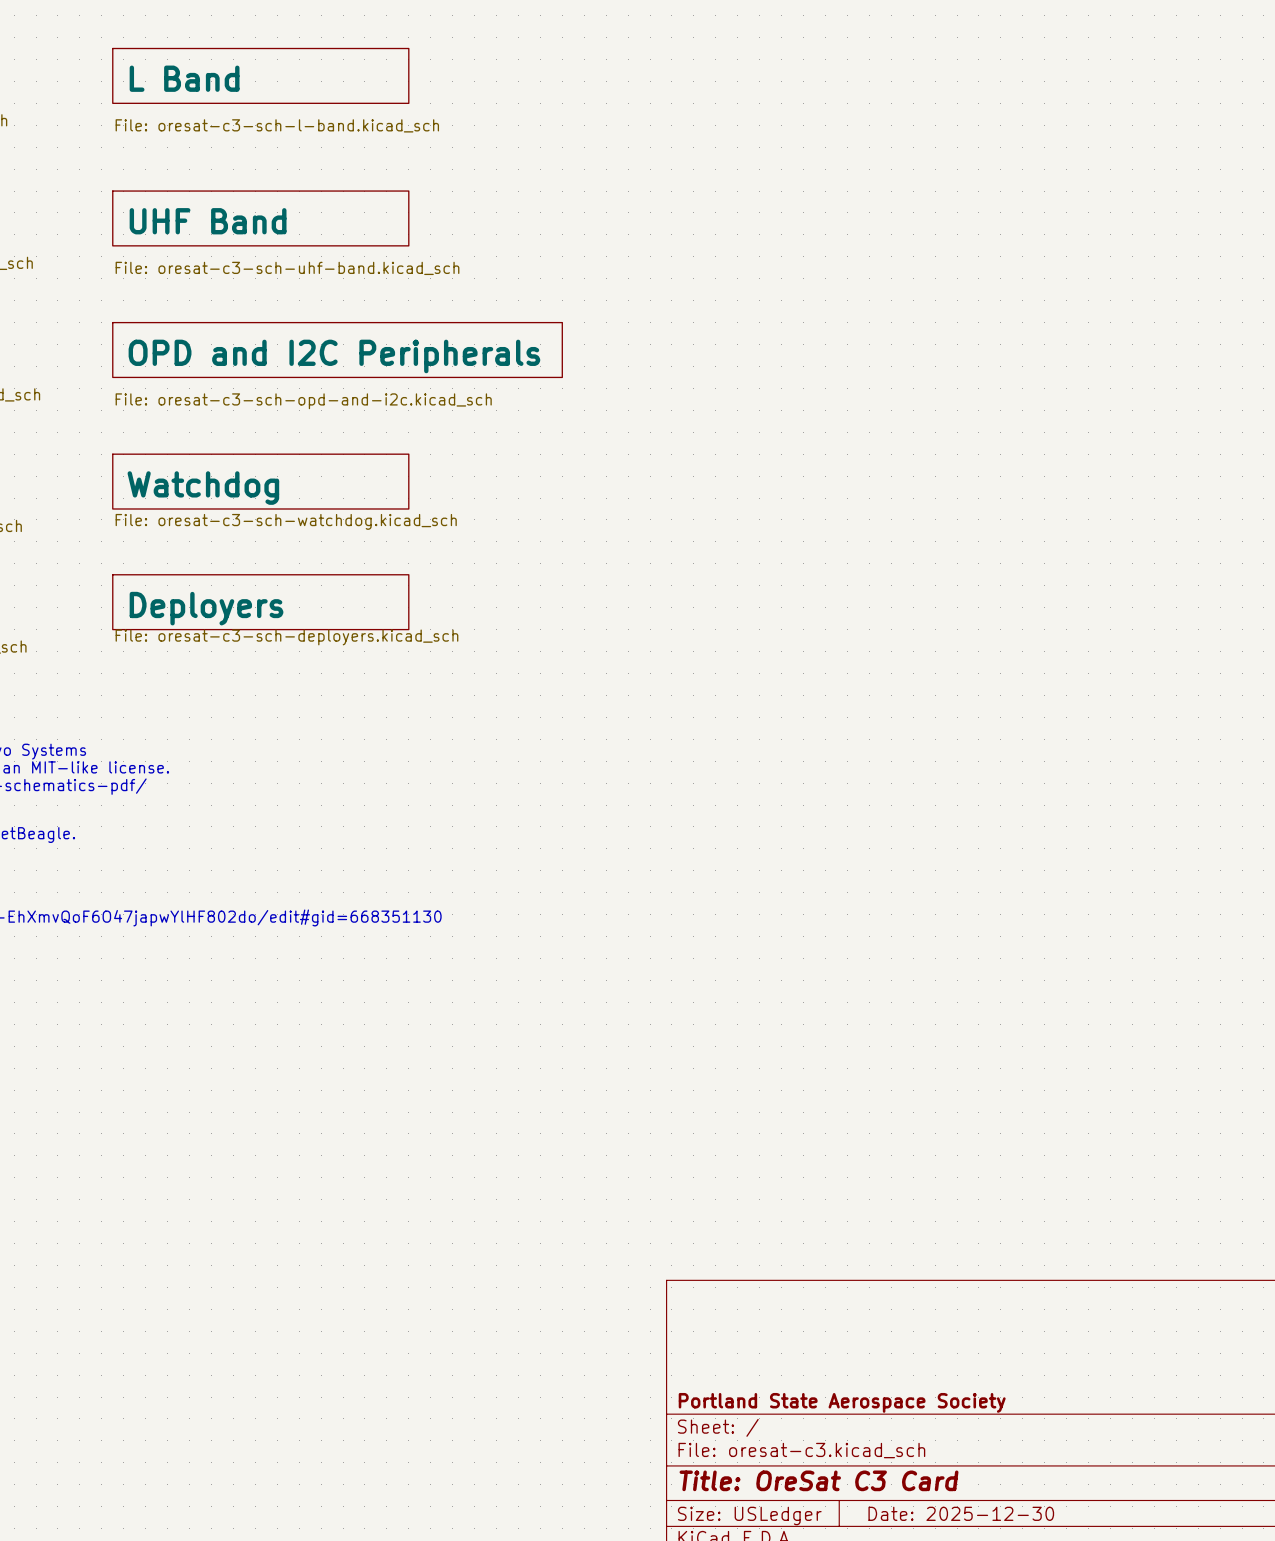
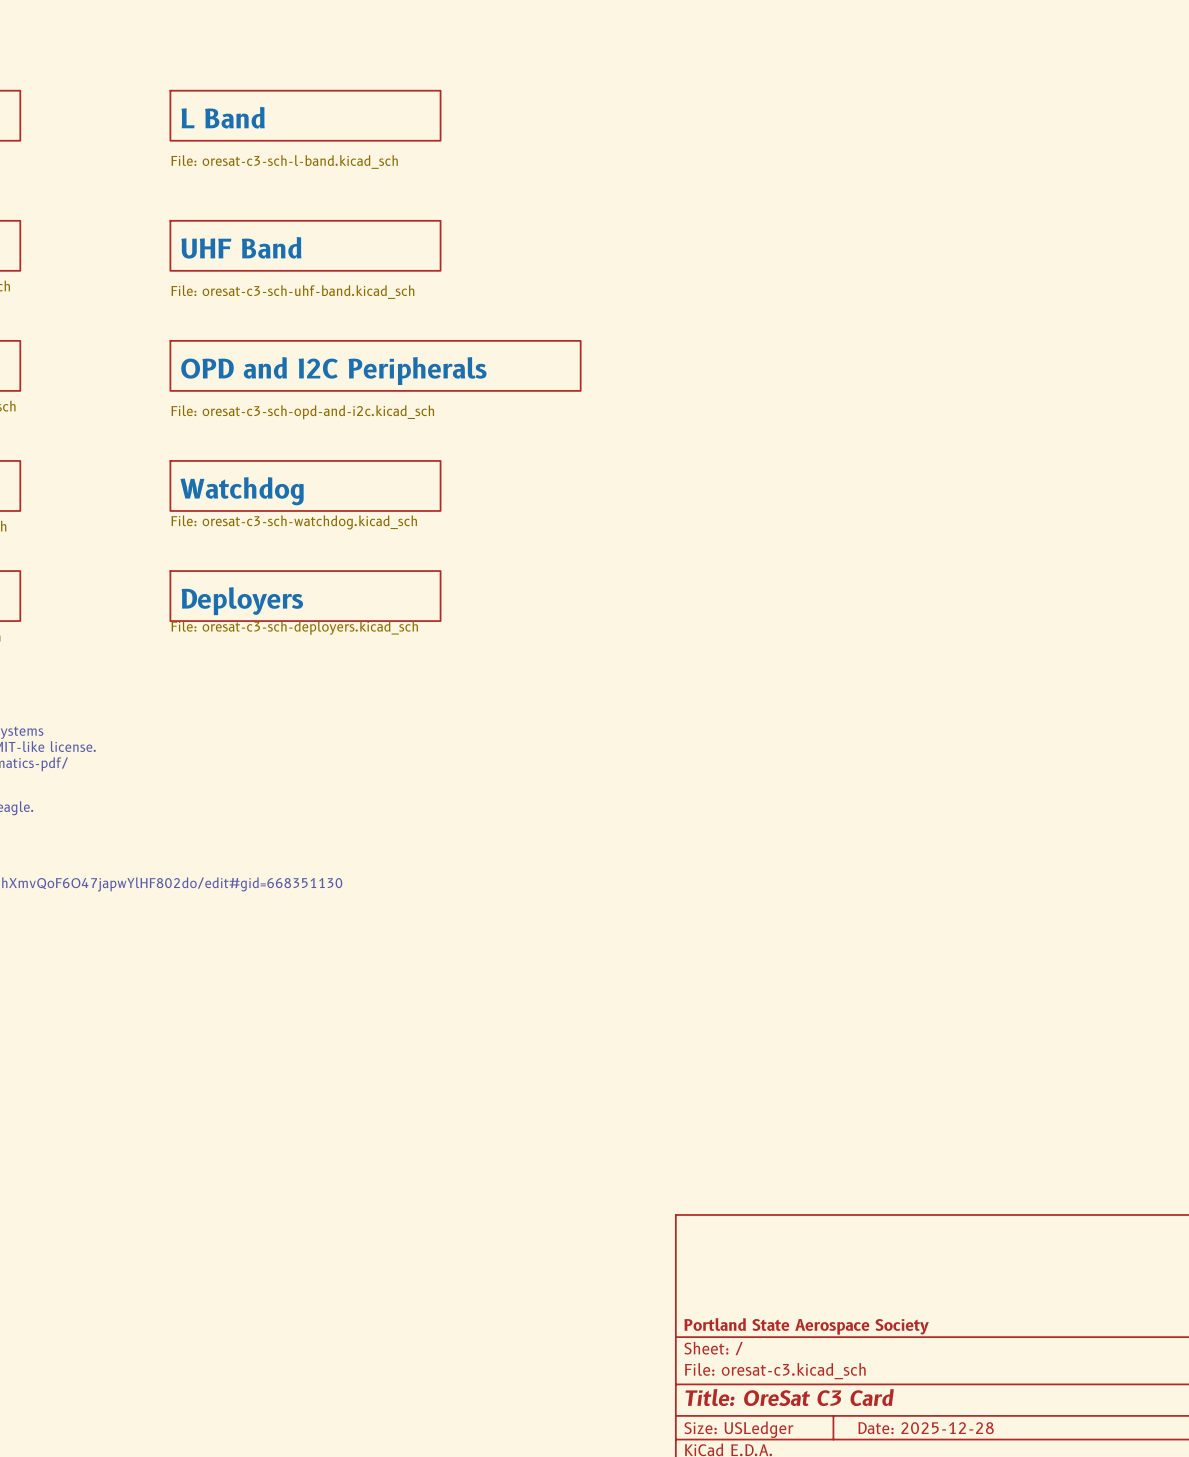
title block: Date: 2025-12-30 (961, 1513) -> Date: 2025-12-28 (926, 1428)

